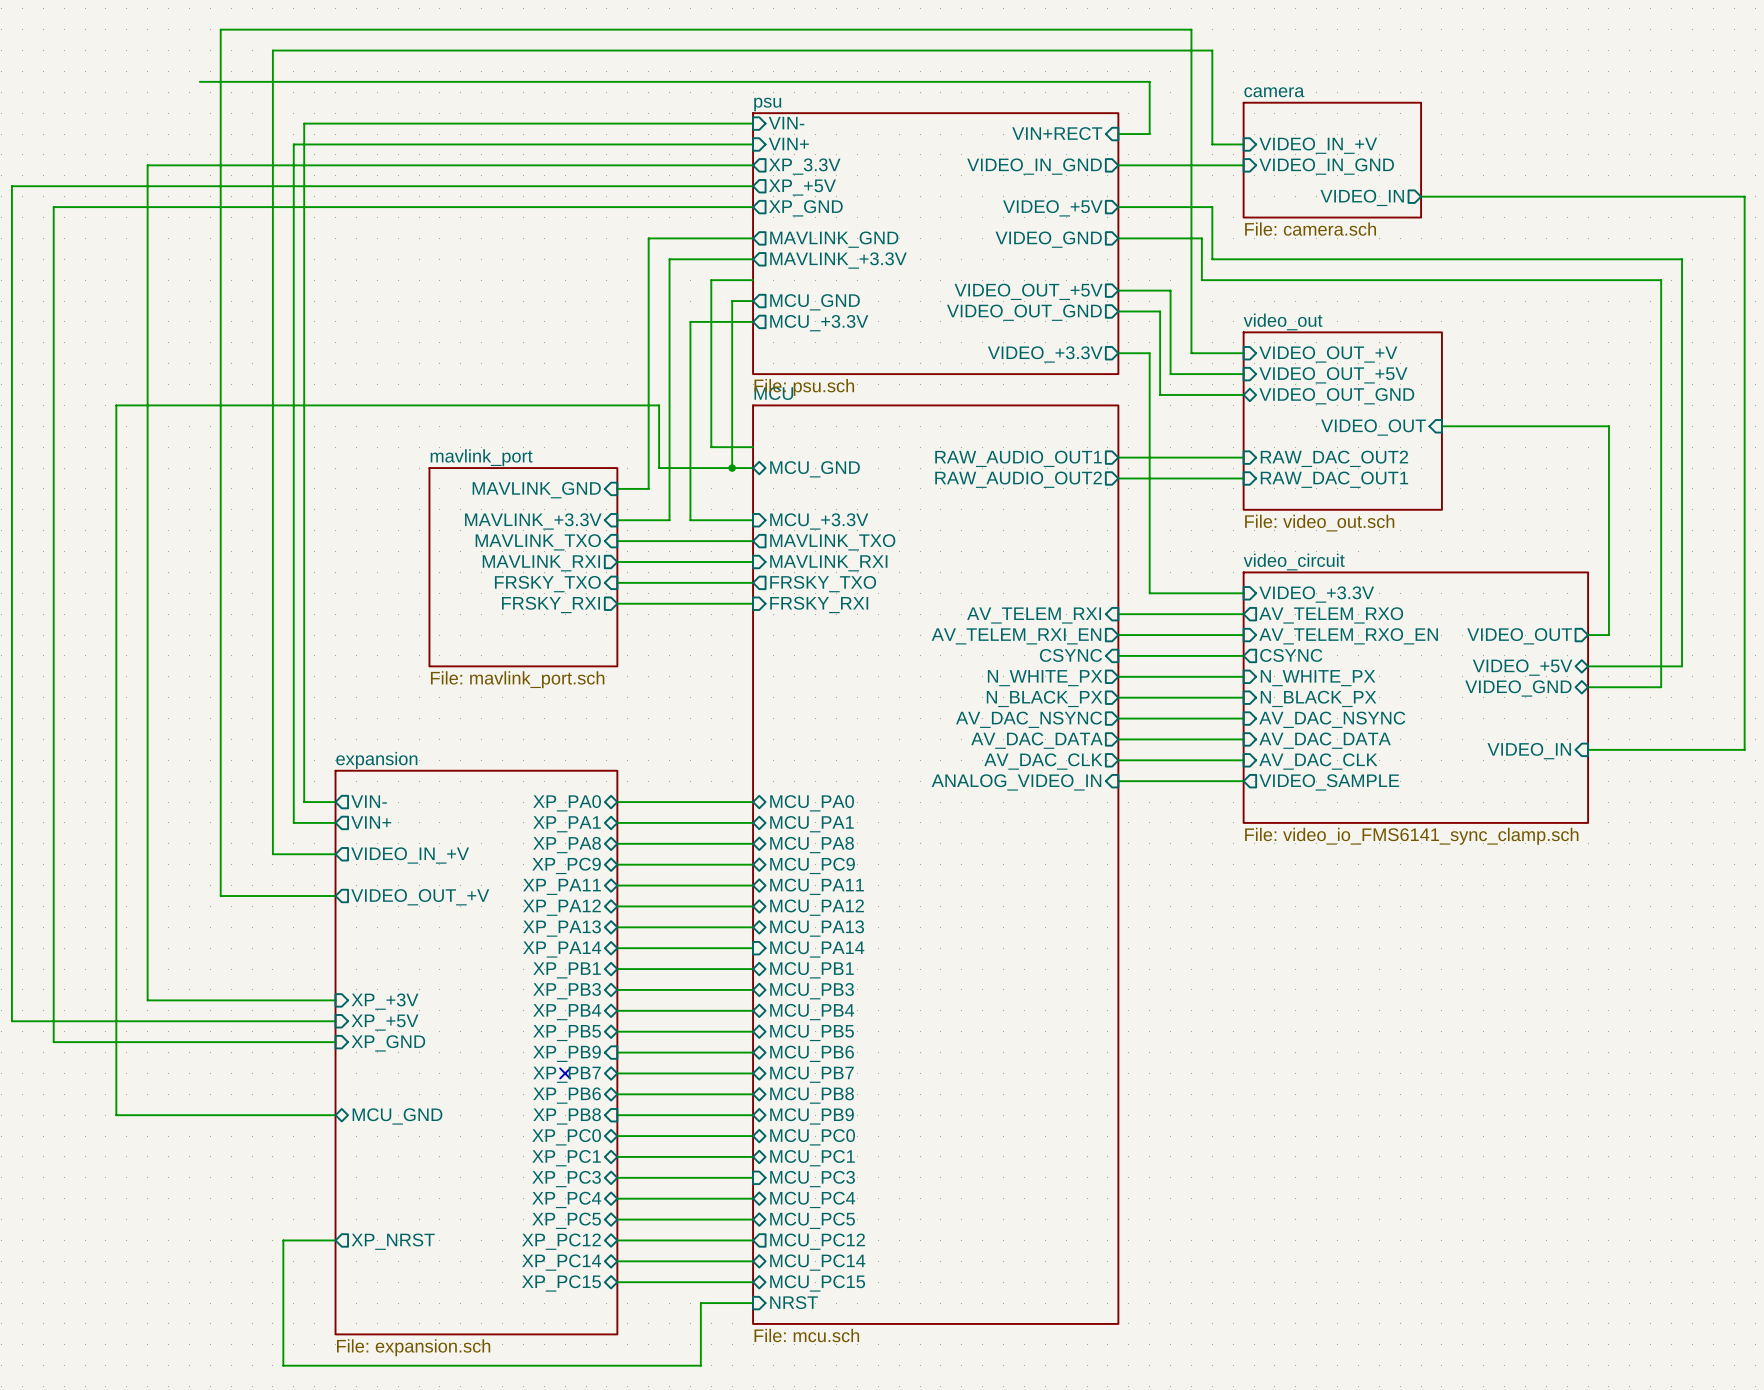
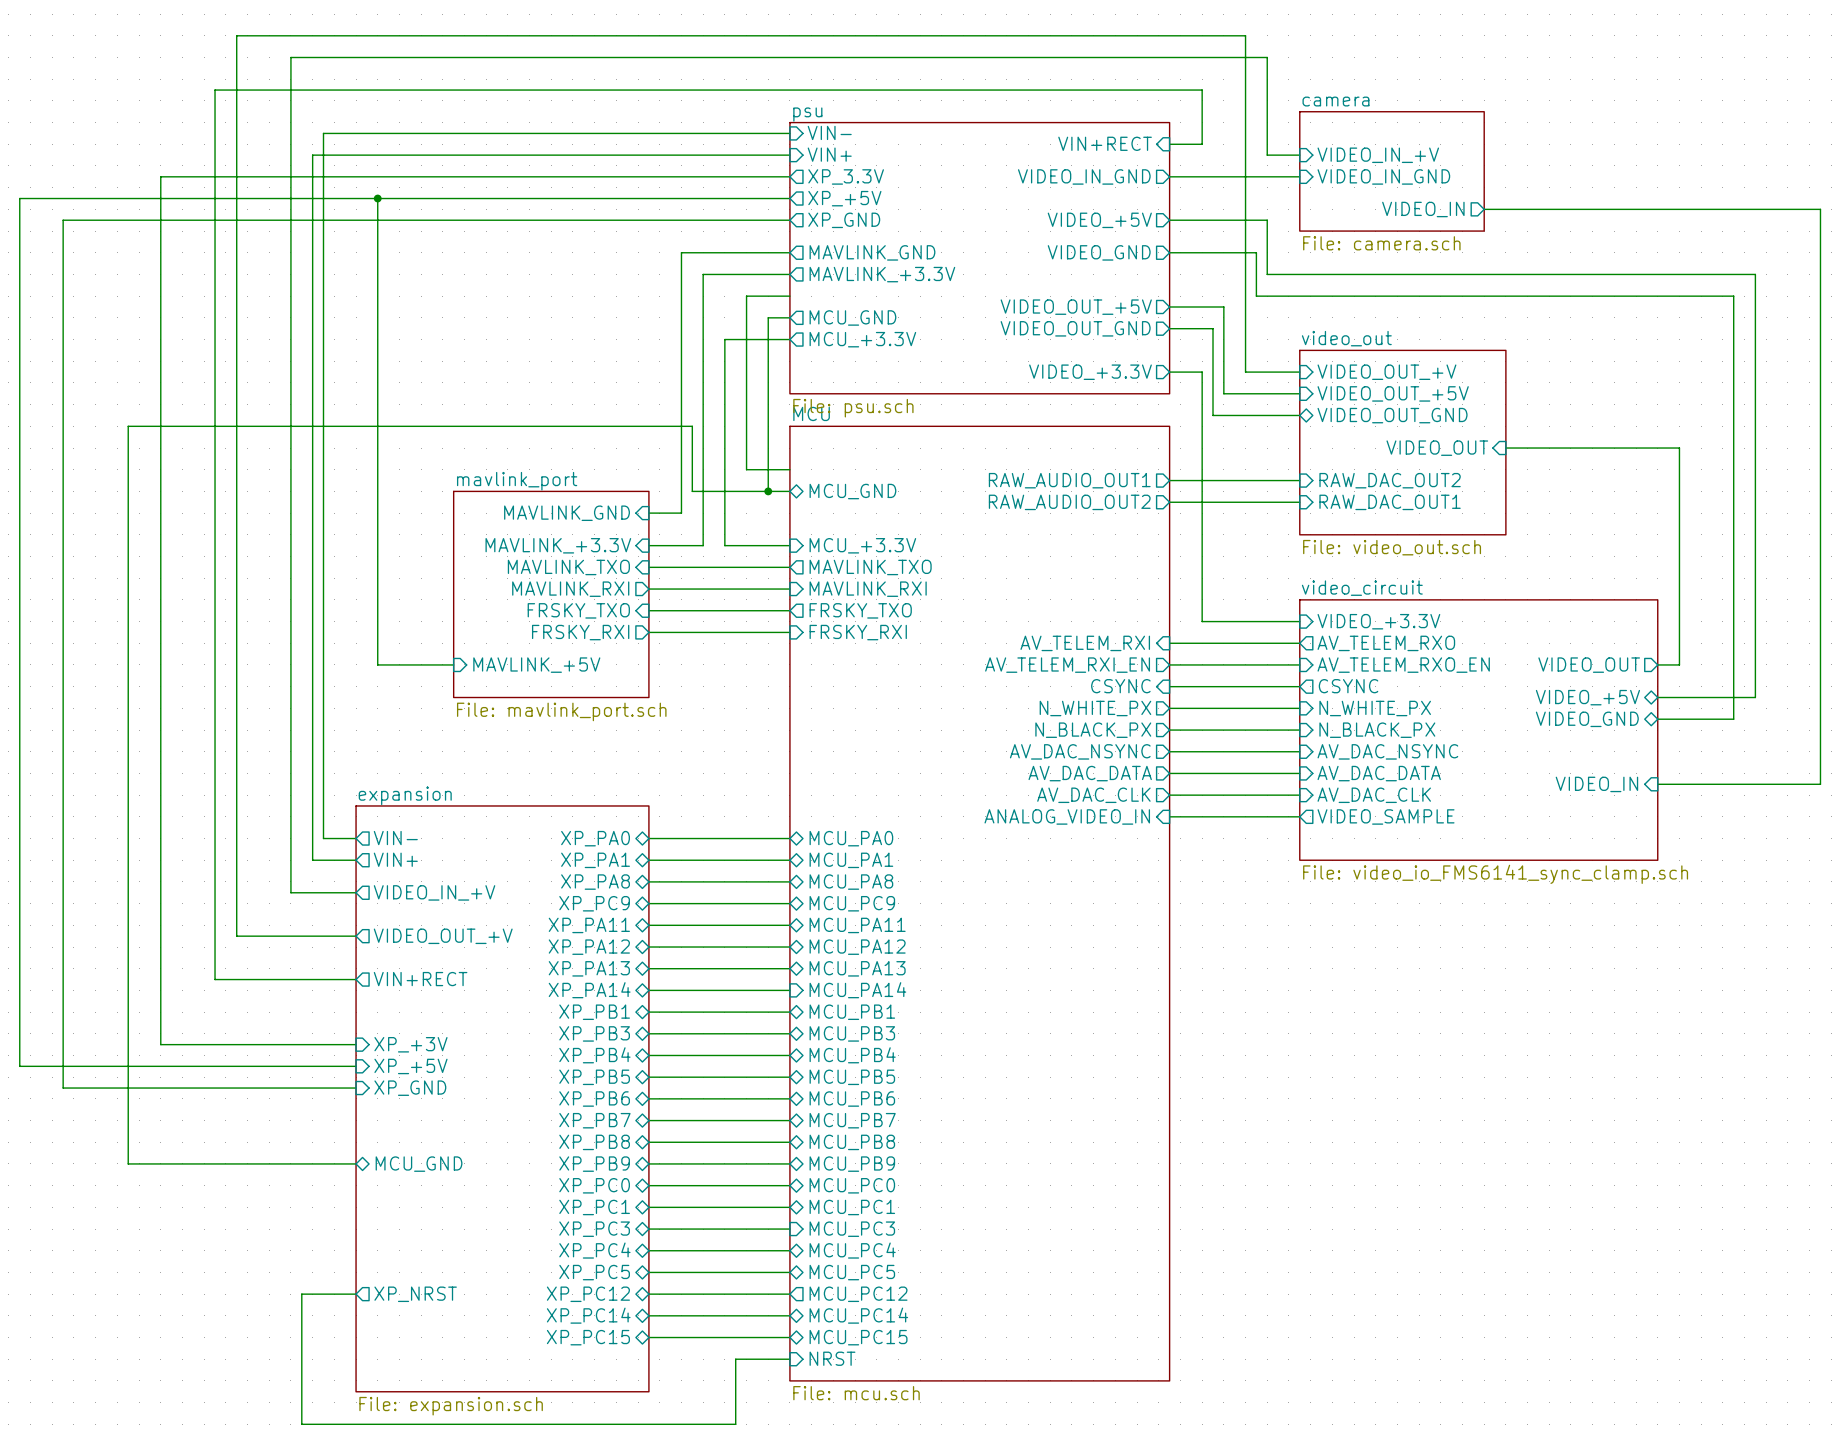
wire: none -> (215, 90) (215, 979) (356, 979)
wire: none -> (377, 198) (377, 664) (453, 664)
junction: none -> (377, 198)
sheet pin: none -> MAVLINK_+5V (536, 665)
sheet pin: none -> VIN+RECT (420, 979)
sheet pin shape: input (567, 1053) -> bidirectional (594, 1099)
sheet pin: XP_PB9 (567, 1053) -> XP_PB6 (594, 1099)
no-connect mark: (565, 1073) -> none
sheet pin: XP_PB6 (567, 1095) -> XP_PB8 (594, 1142)
sheet pin shape: input (567, 1116) -> bidirectional (594, 1164)
sheet pin: XP_PB8 (567, 1116) -> XP_PB9 (594, 1164)

